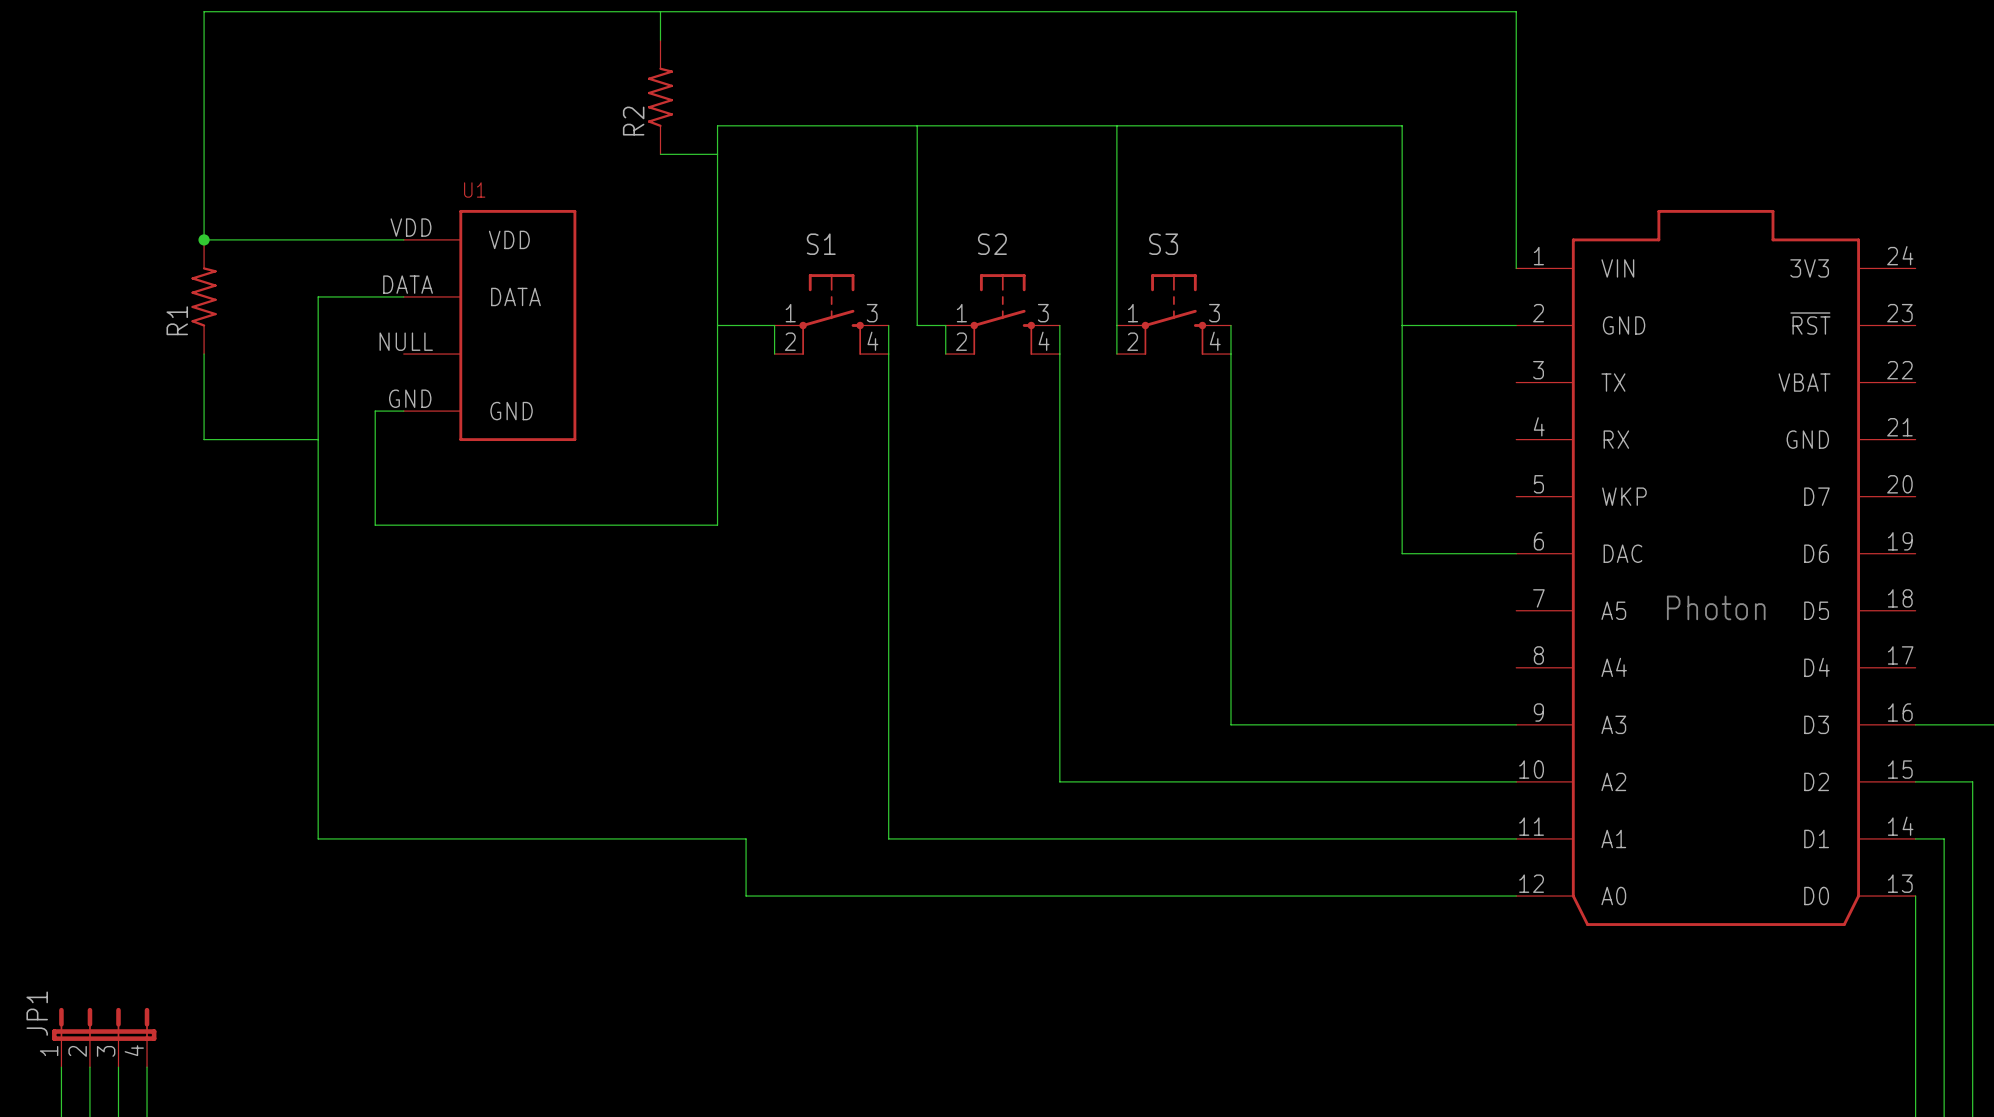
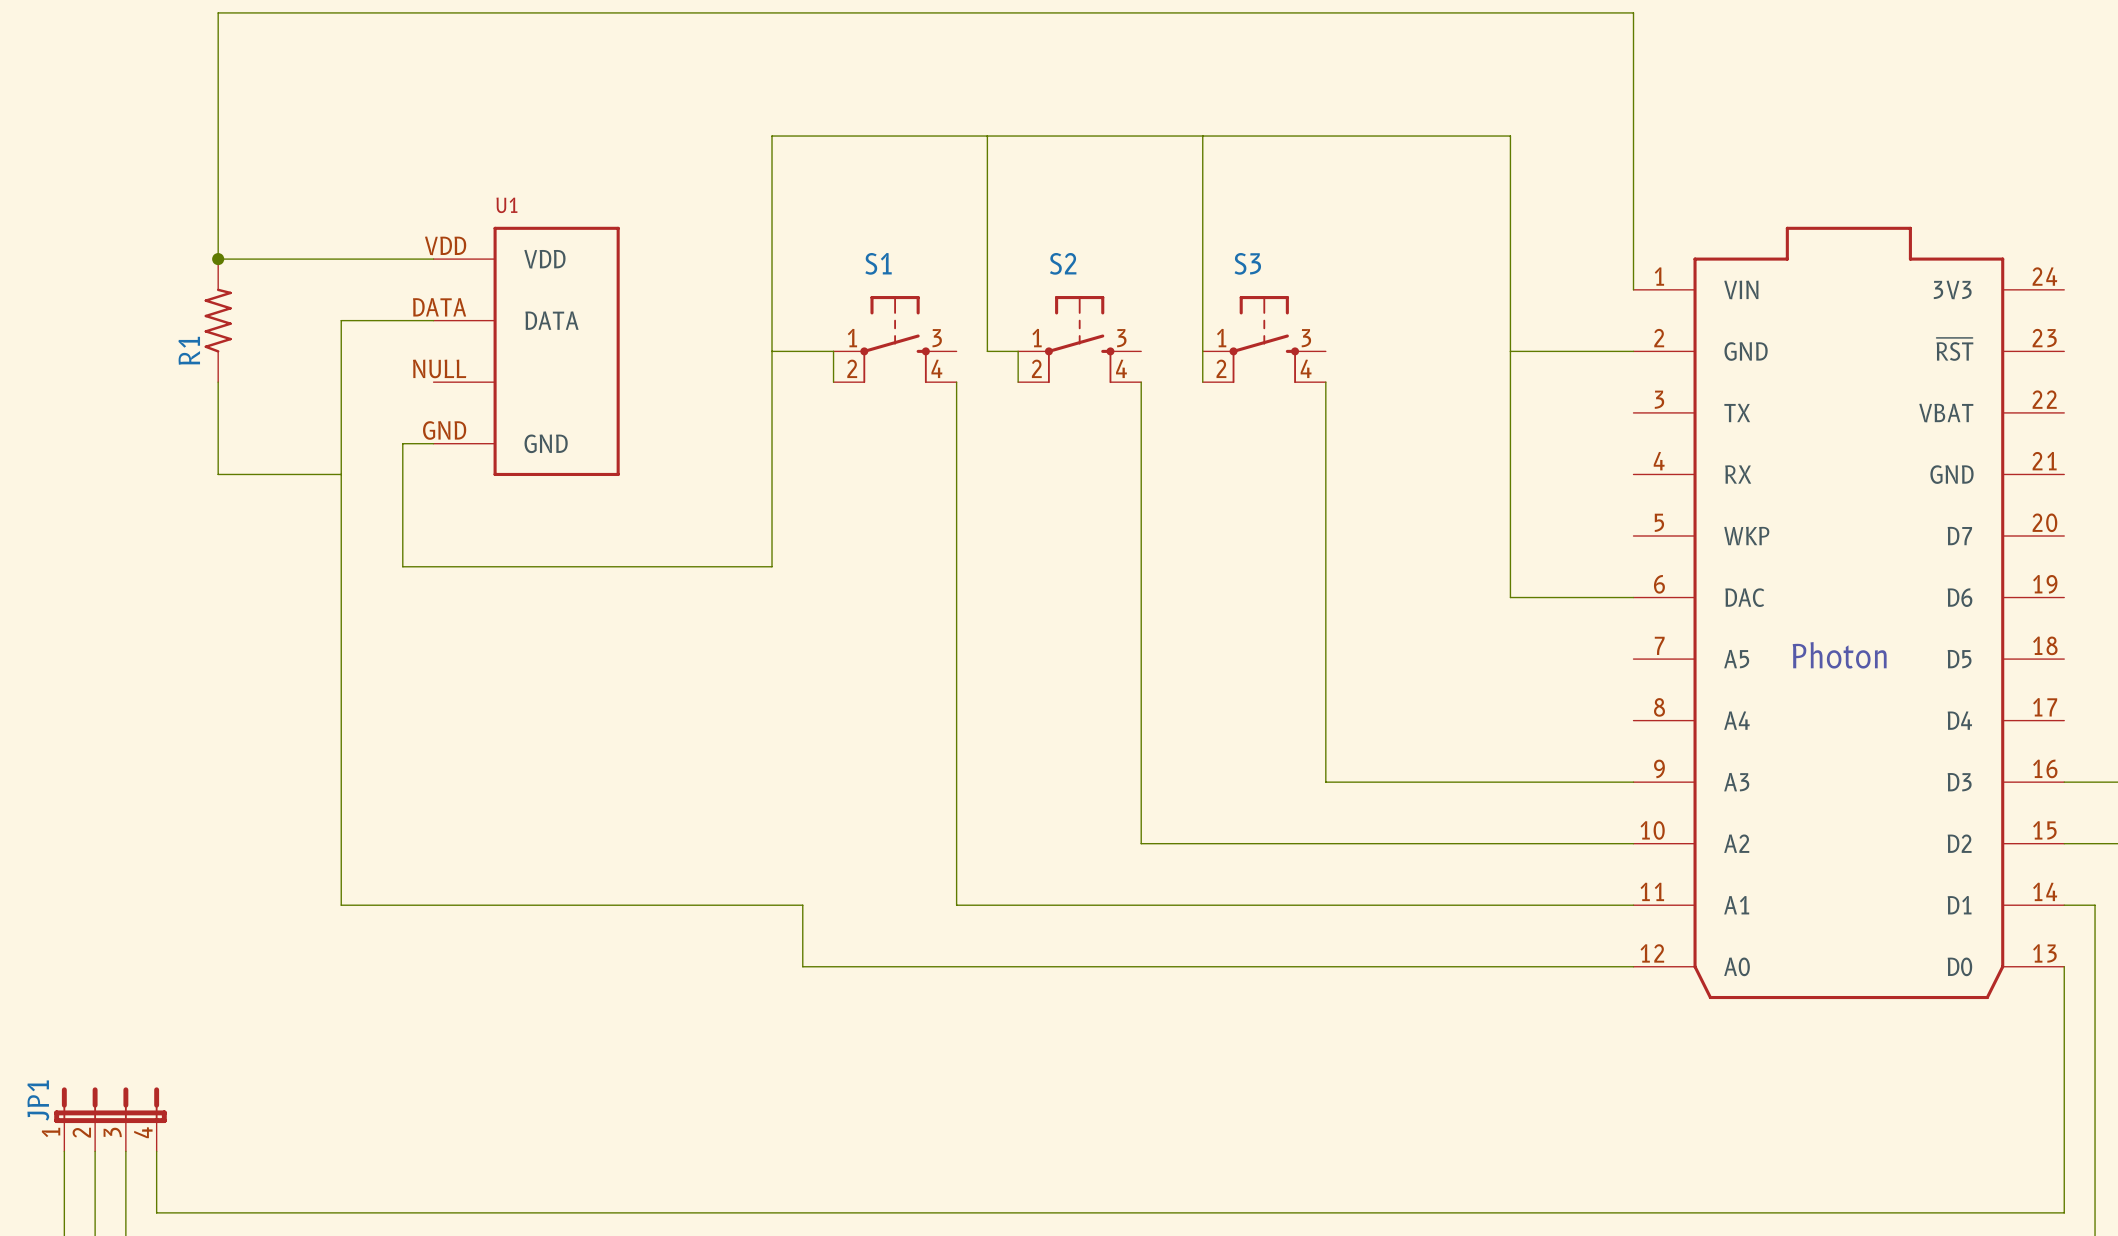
wire: (660, 11) (660, 40) -> none
R2: (660, 97) -> none
wire: (660, 154) (717, 154) -> none
wire: (888, 325) (888, 354) -> none
wire: (1059, 325) (1059, 354) -> none
wire: (1230, 325) (1230, 354) -> none

